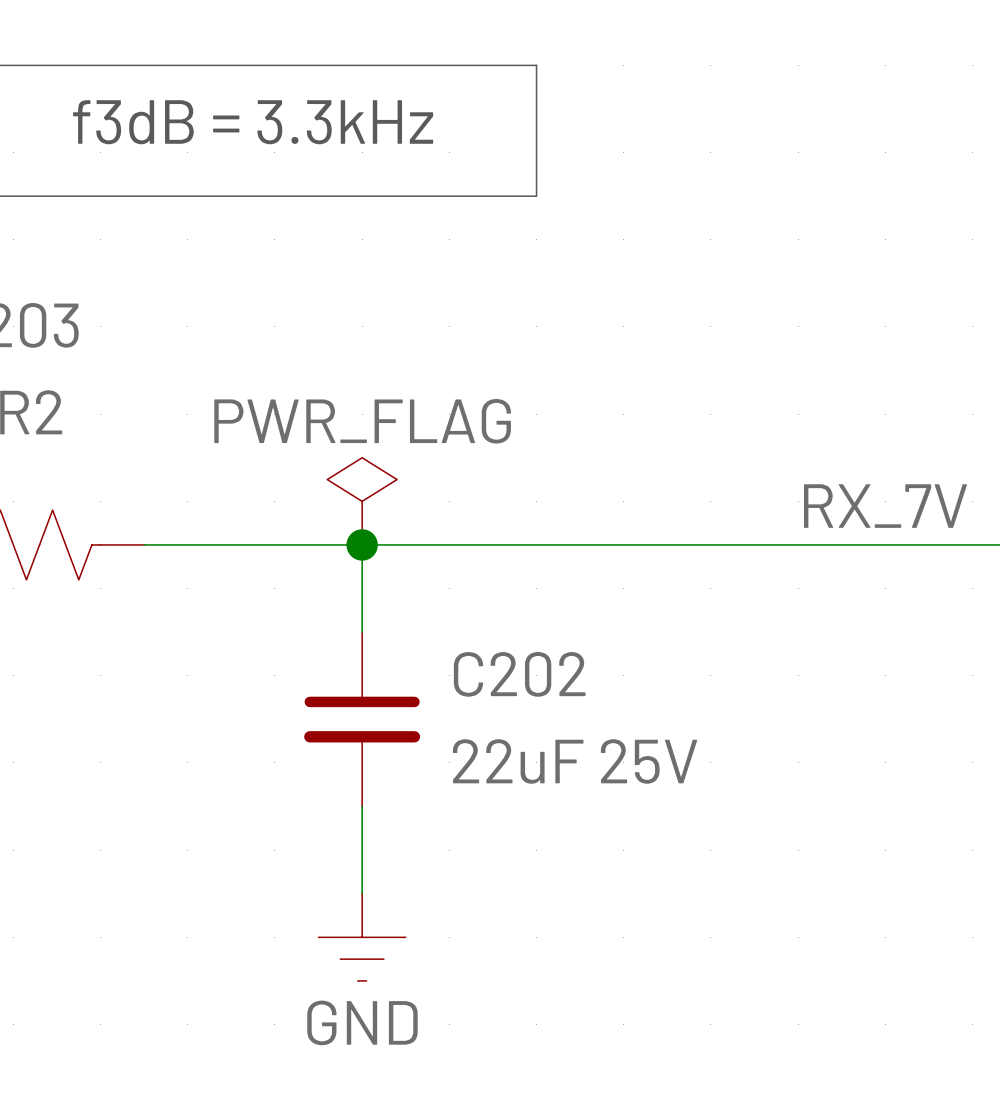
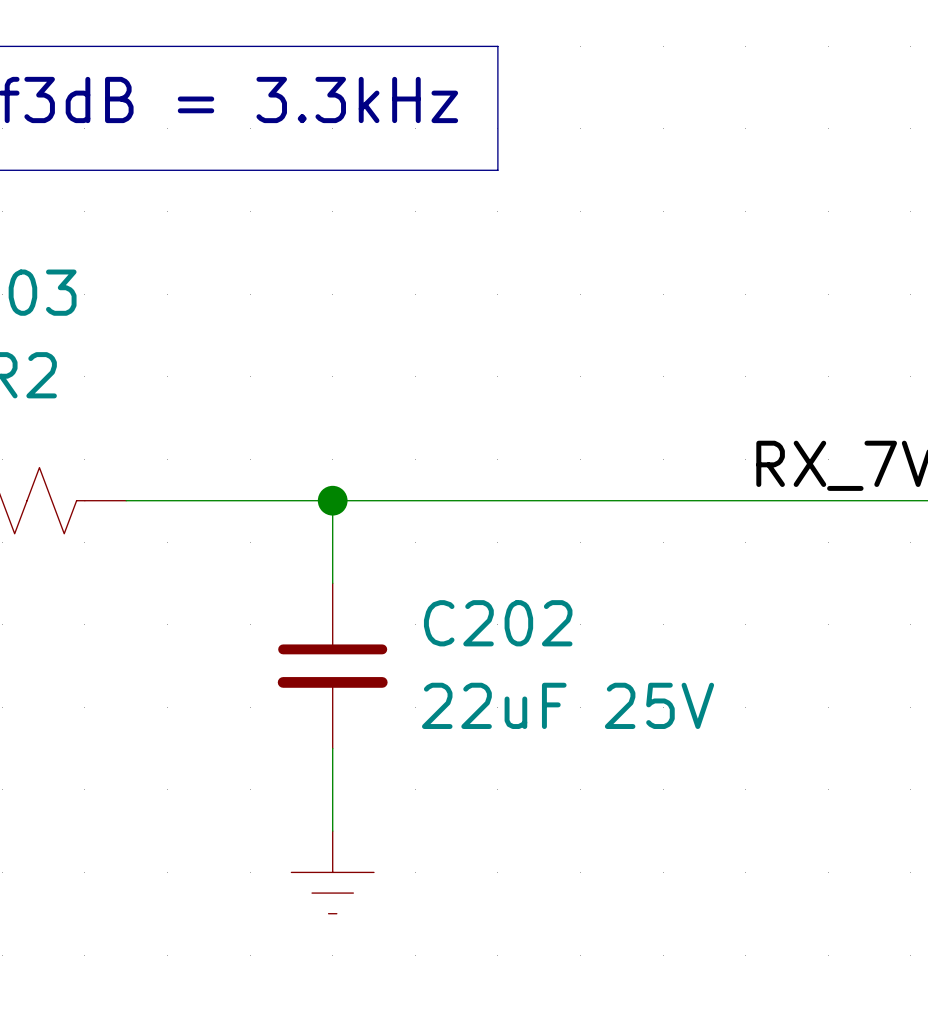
power symbol: PWR_FLAG (362, 501) -> none
power symbol text: GND (362, 1022) -> none

